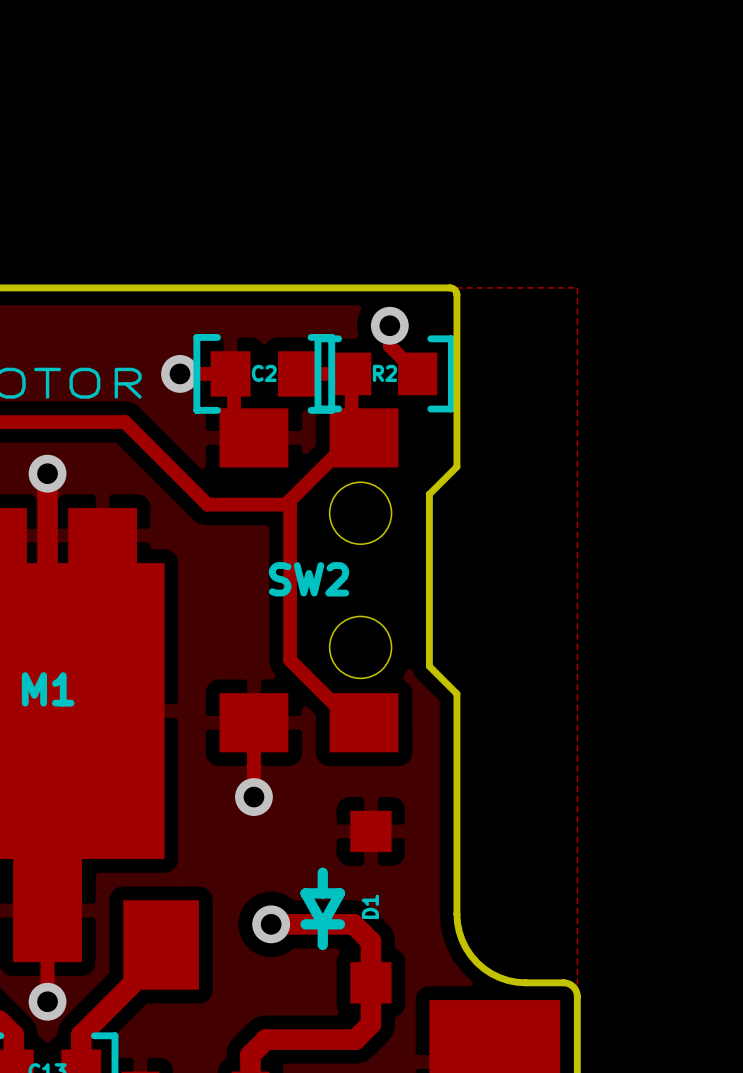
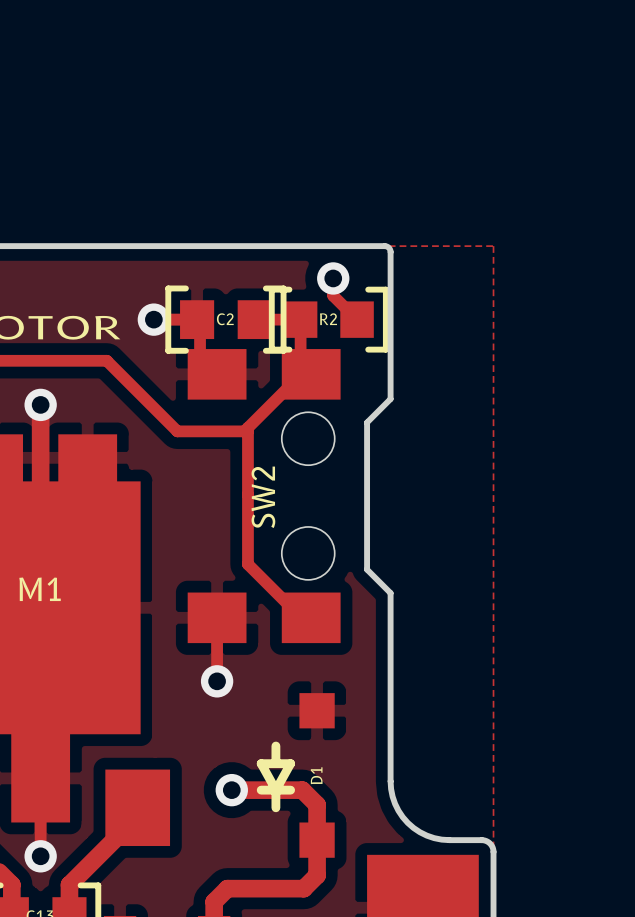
SW2 name rotation: 0° (309, 579) -> 90° counterclockwise (263, 497)

